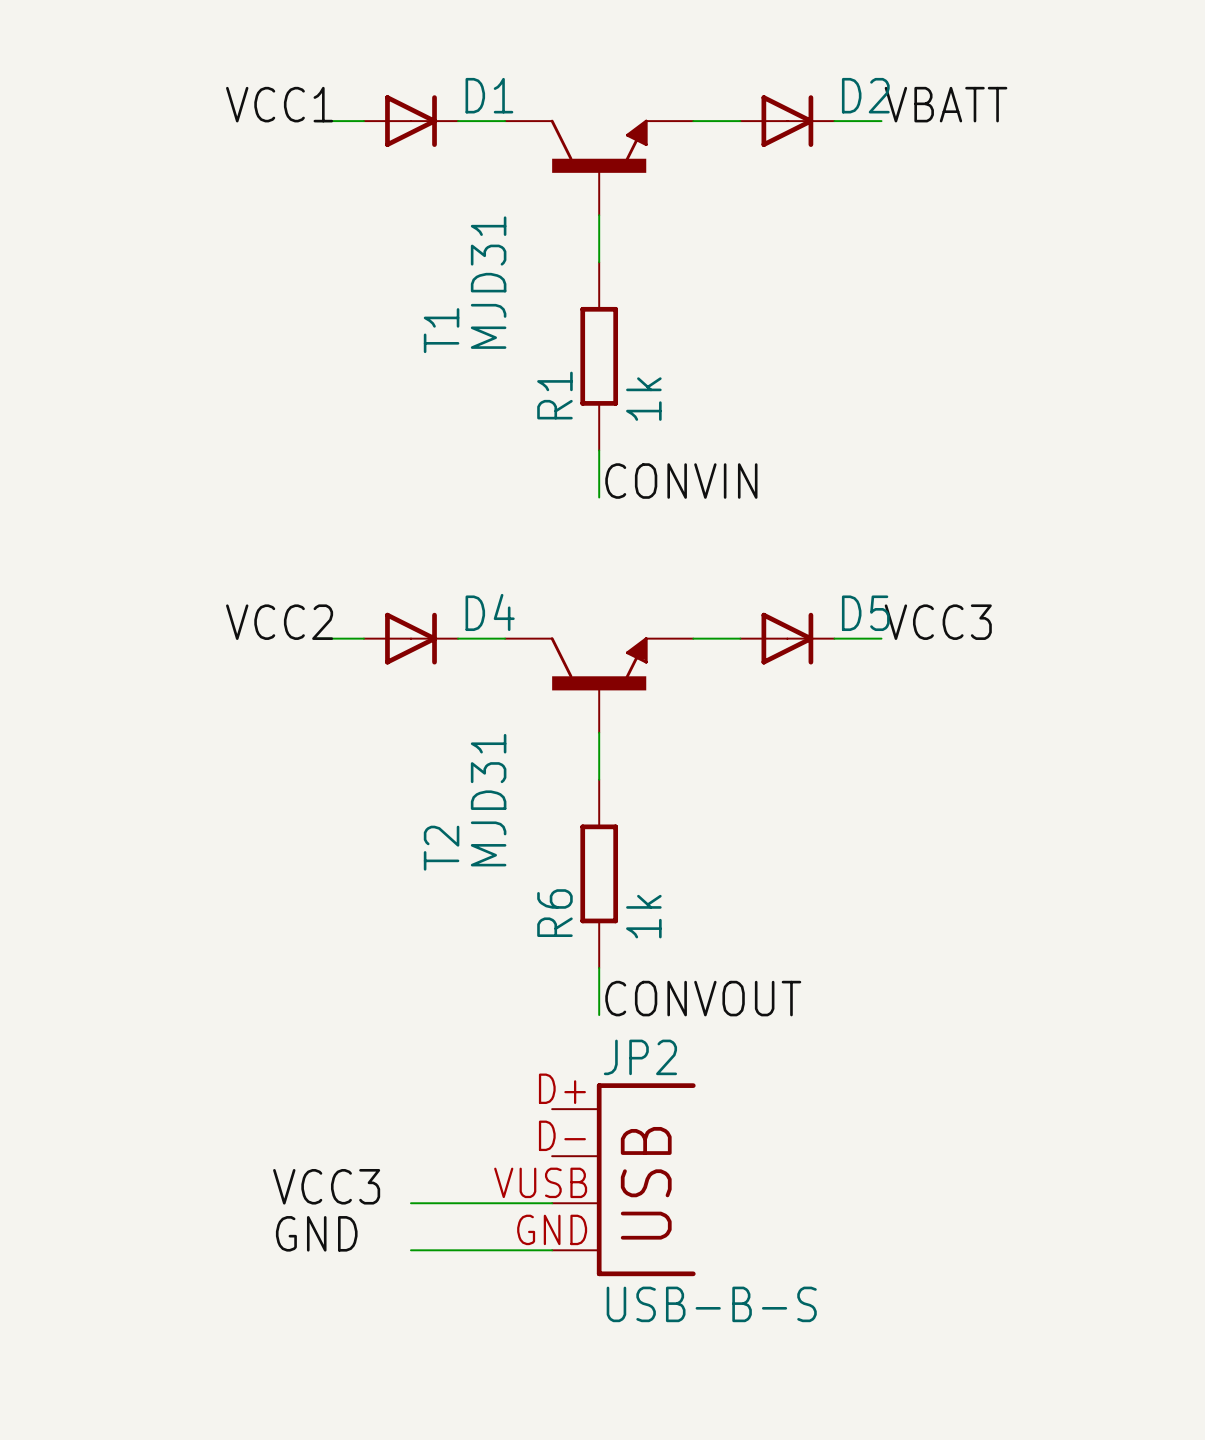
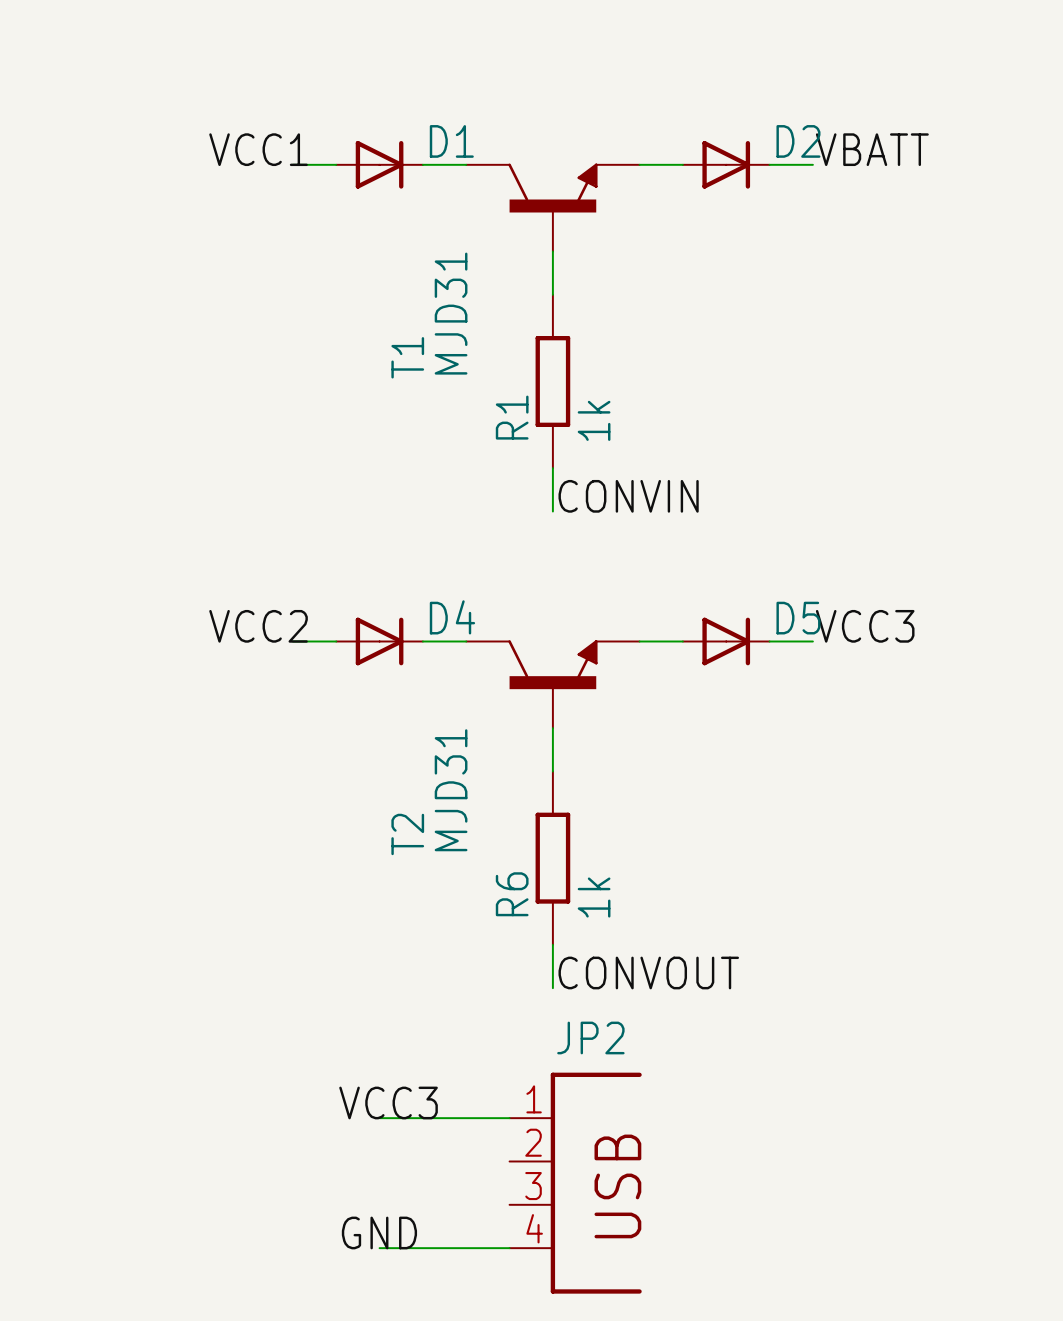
JP2 symbol: [552, 1083, 696, 1277] -> [509, 1072, 642, 1294]
label position: VCC3 (326, 1186) -> VCC3 (388, 1102)
wire: (410, 1203) (552, 1203) -> (379, 1118) (509, 1118)
label position: GND (316, 1233) -> GND (379, 1232)
wire: (410, 1250) (552, 1250) -> (379, 1248) (509, 1248)
JP2 value: USB-B-S (711, 1304) -> none

